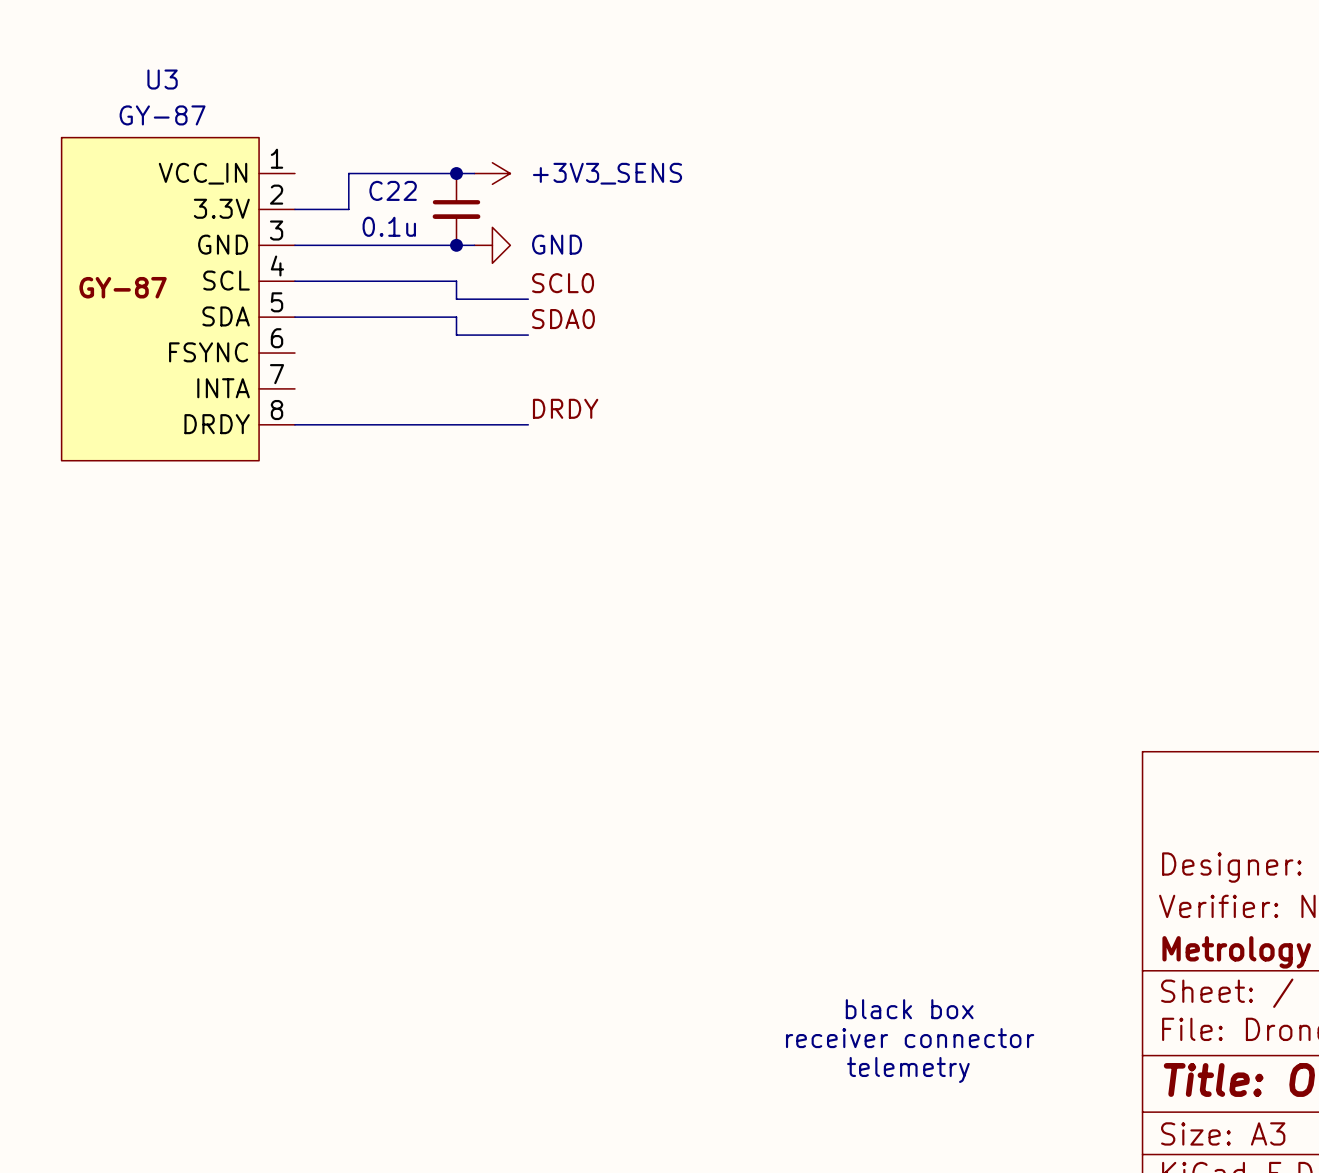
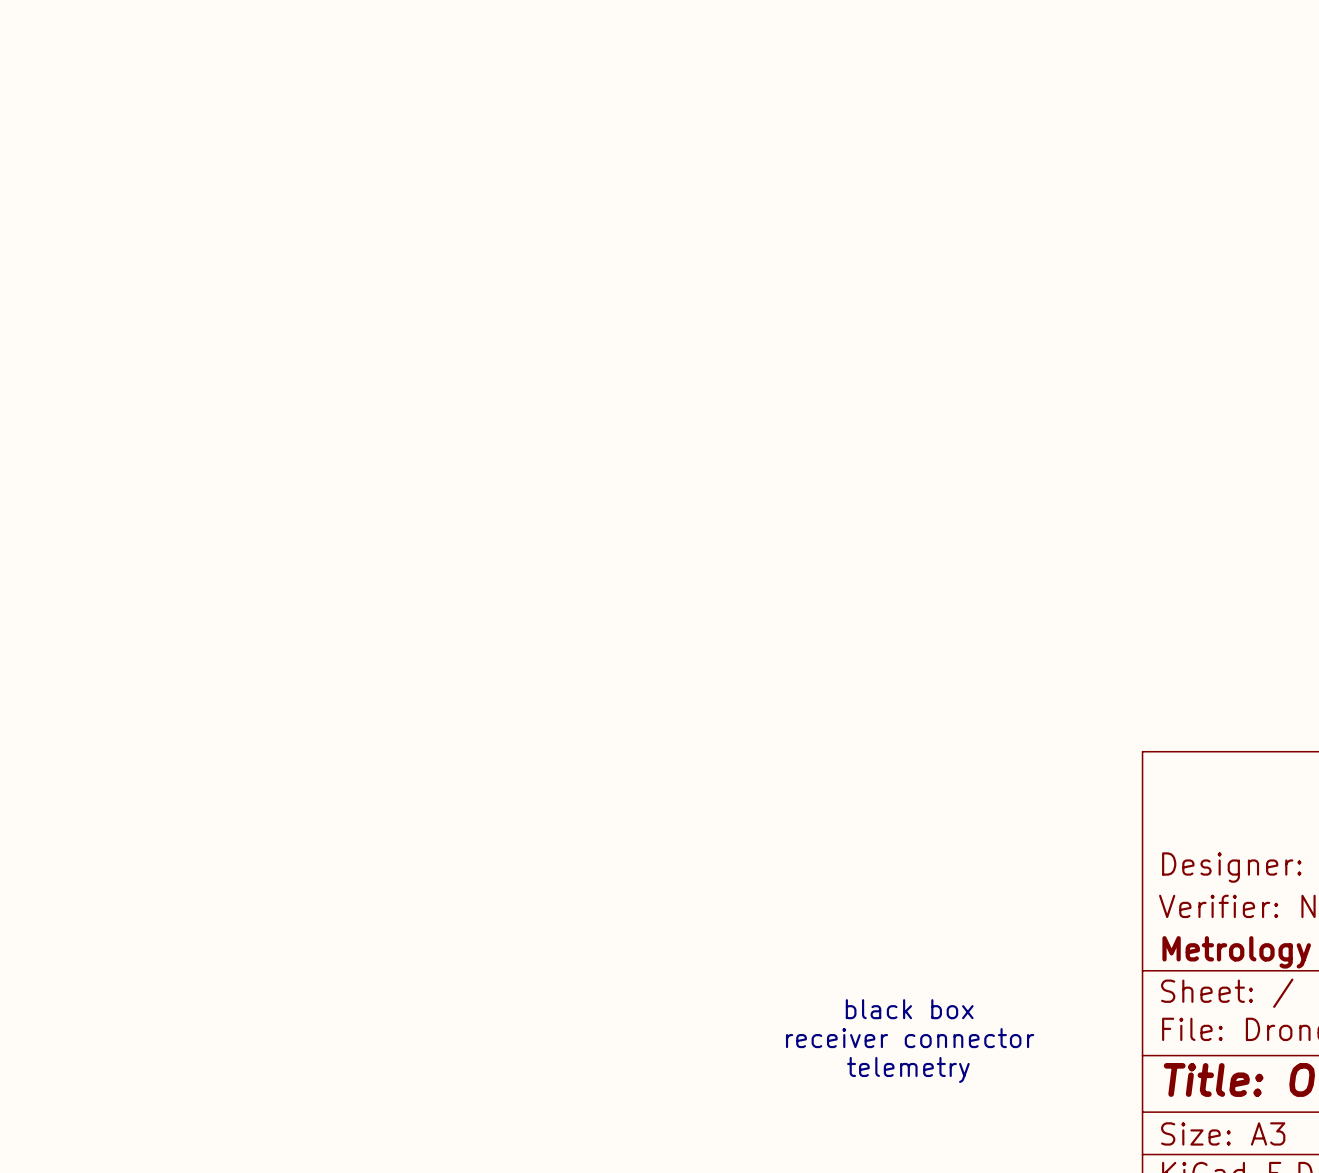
junction: (456, 173) -> none
wire: (474, 173) (348, 173) (348, 209) (294, 209) -> none
power symbol: +3V3_SENS (492, 173) -> none
C22: 0.1u (456, 209) -> none
wire: (294, 245) (474, 245) -> none
junction: (456, 245) -> none
power symbol: GND (492, 245) -> none
wire: (294, 281) (456, 281) (456, 299) (528, 299) -> none
label: SCL0 (563, 283) -> none
U3: GY-87 (178, 299) -> none
wire: (294, 317) (456, 317) (456, 335) (528, 335) -> none
label: SDA0 (563, 319) -> none
label: DRDY (565, 408) -> none
wire: (294, 424) (528, 424) -> none

